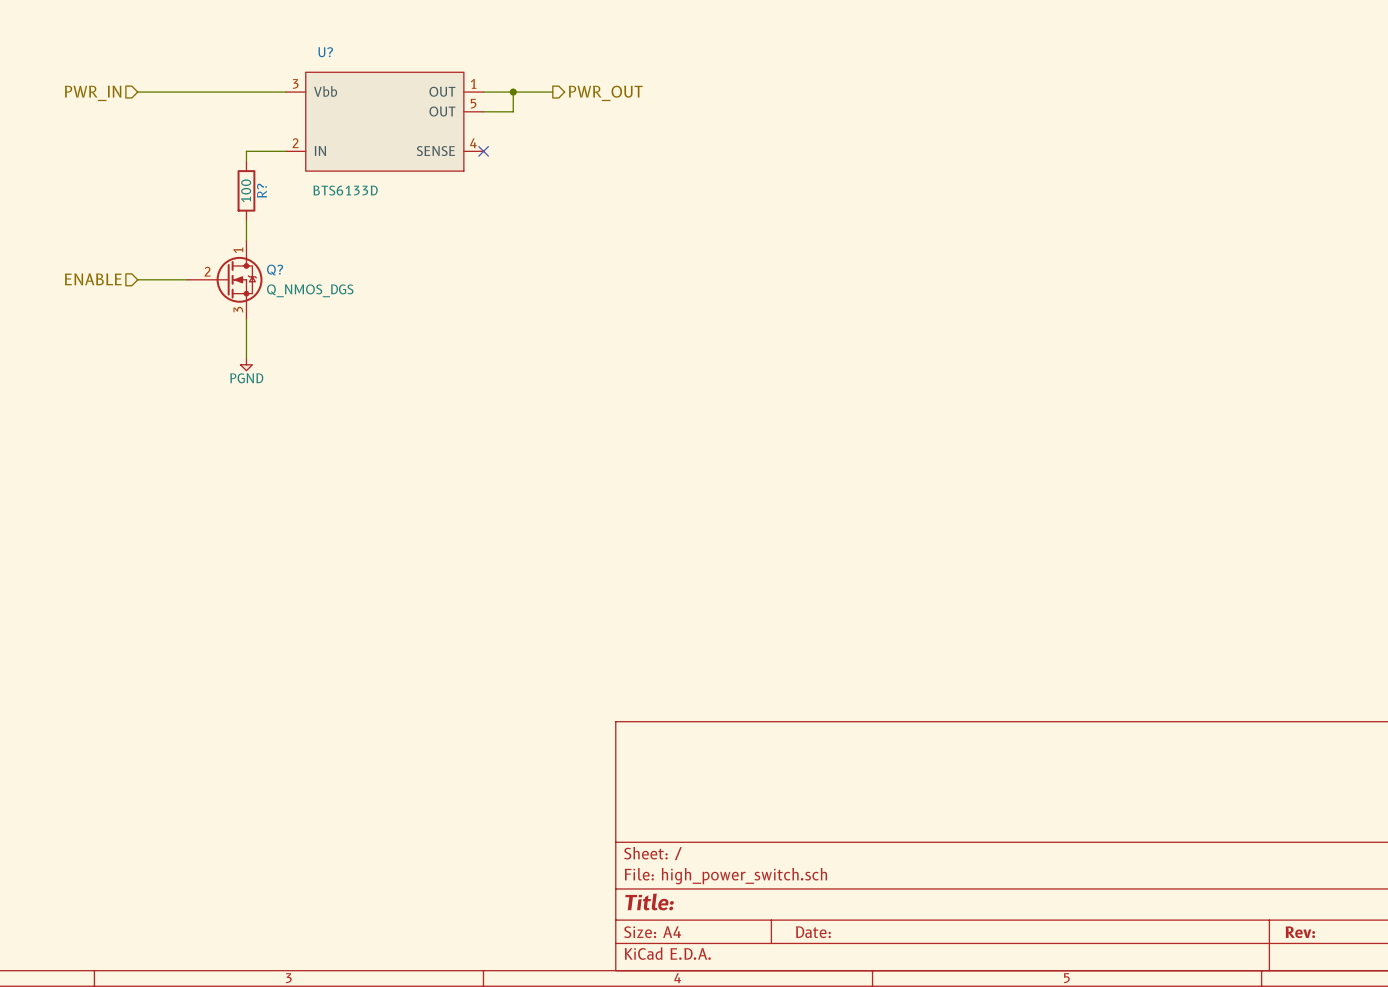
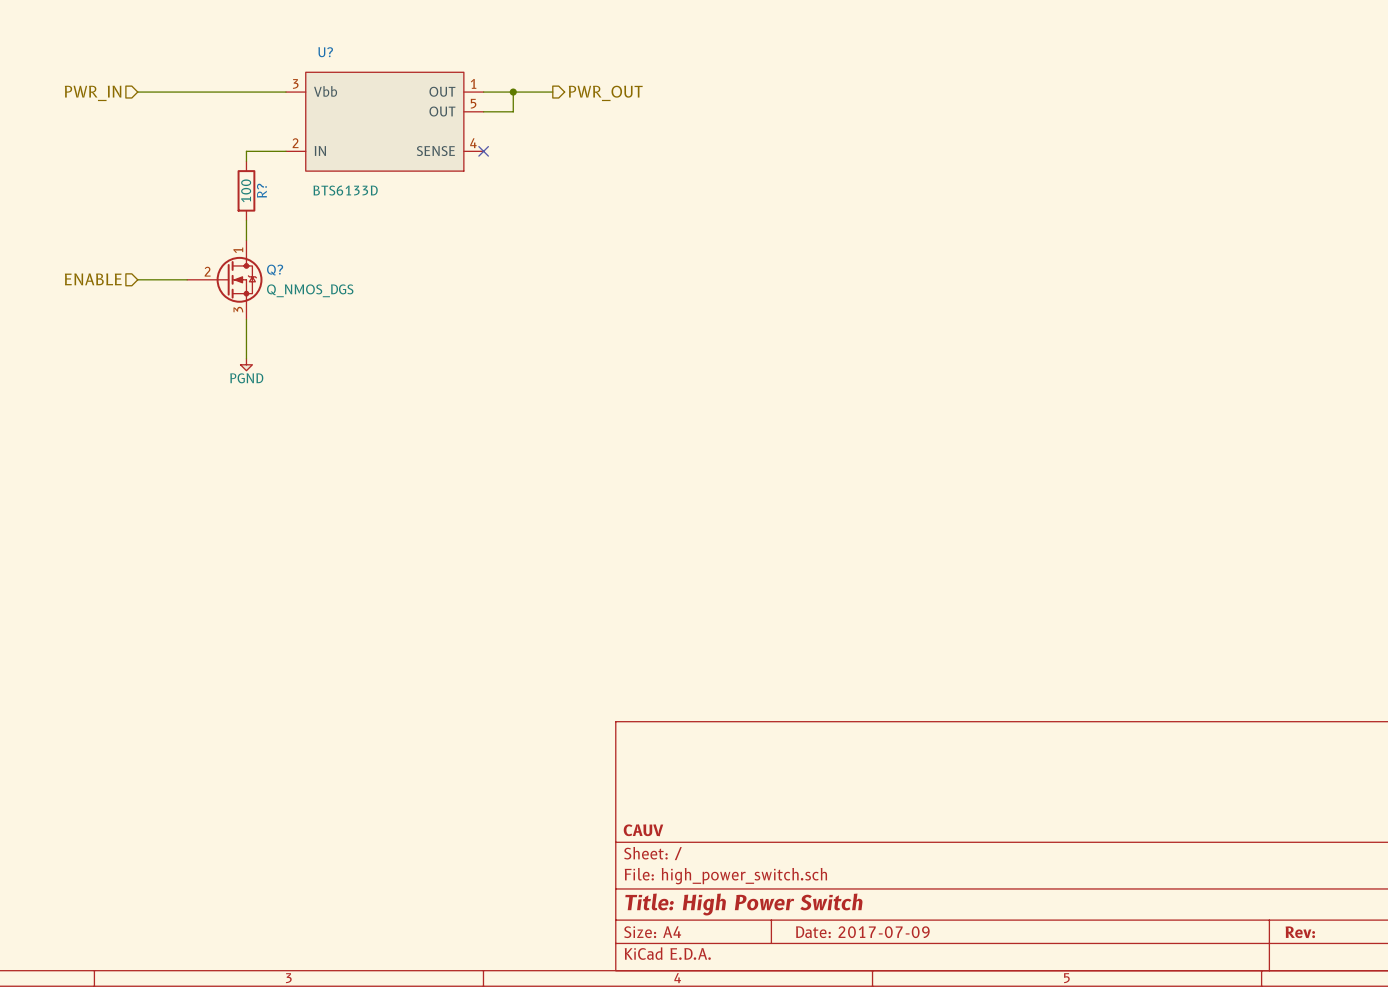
title block: none -> CAUV (643, 830)
title block: Title: (649, 901) -> Title: High Power Switch (743, 904)
title block: Date: (813, 932) -> Date: 2017-07-09 (862, 932)

